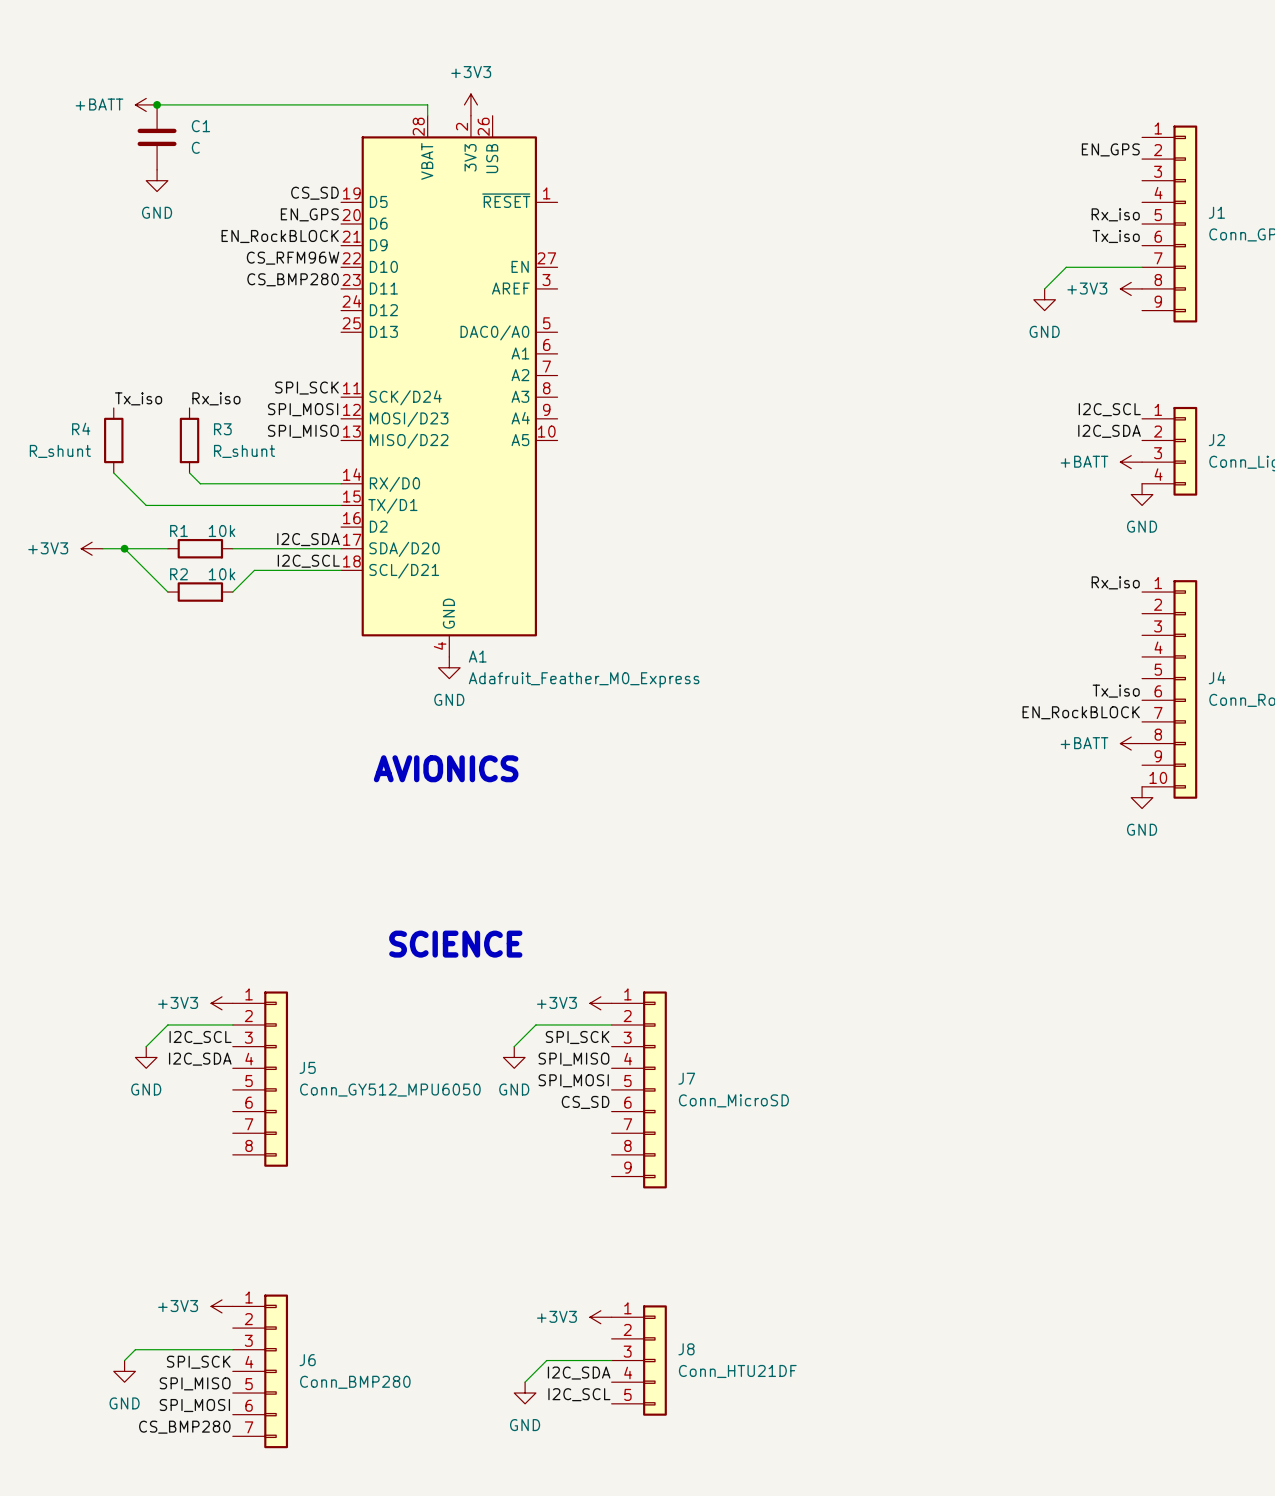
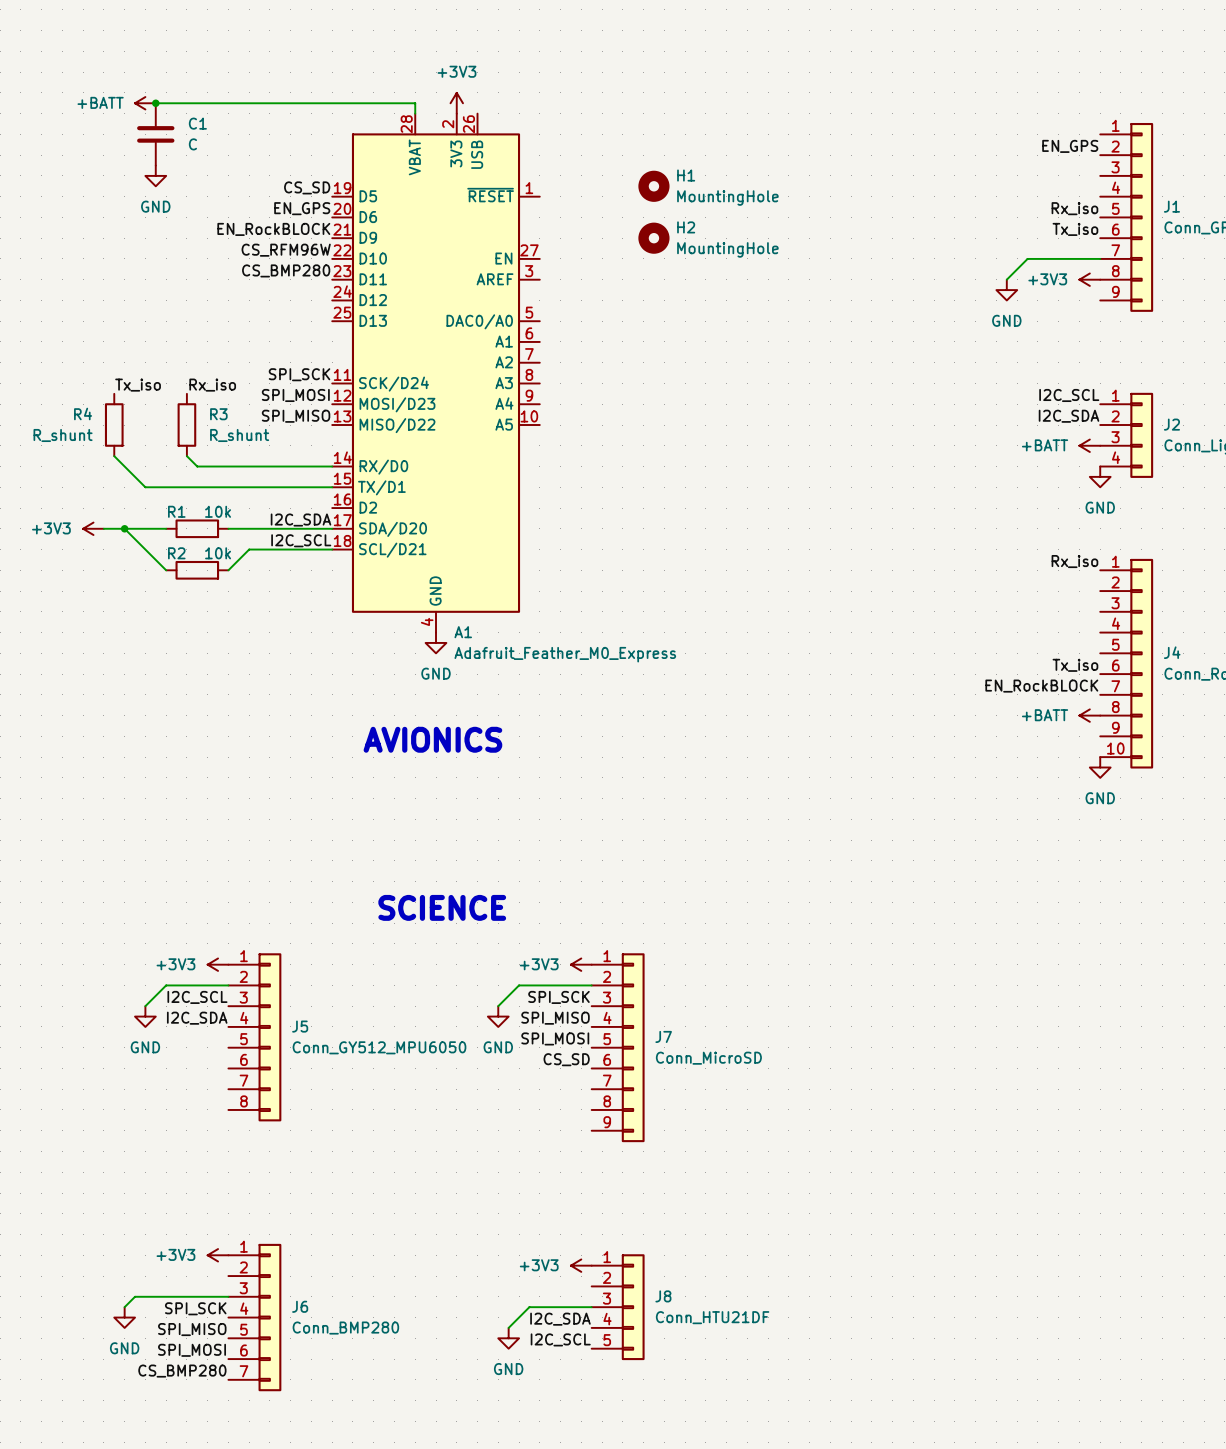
H1: none -> MountingHole (653, 186)
H2: none -> MountingHole (653, 238)

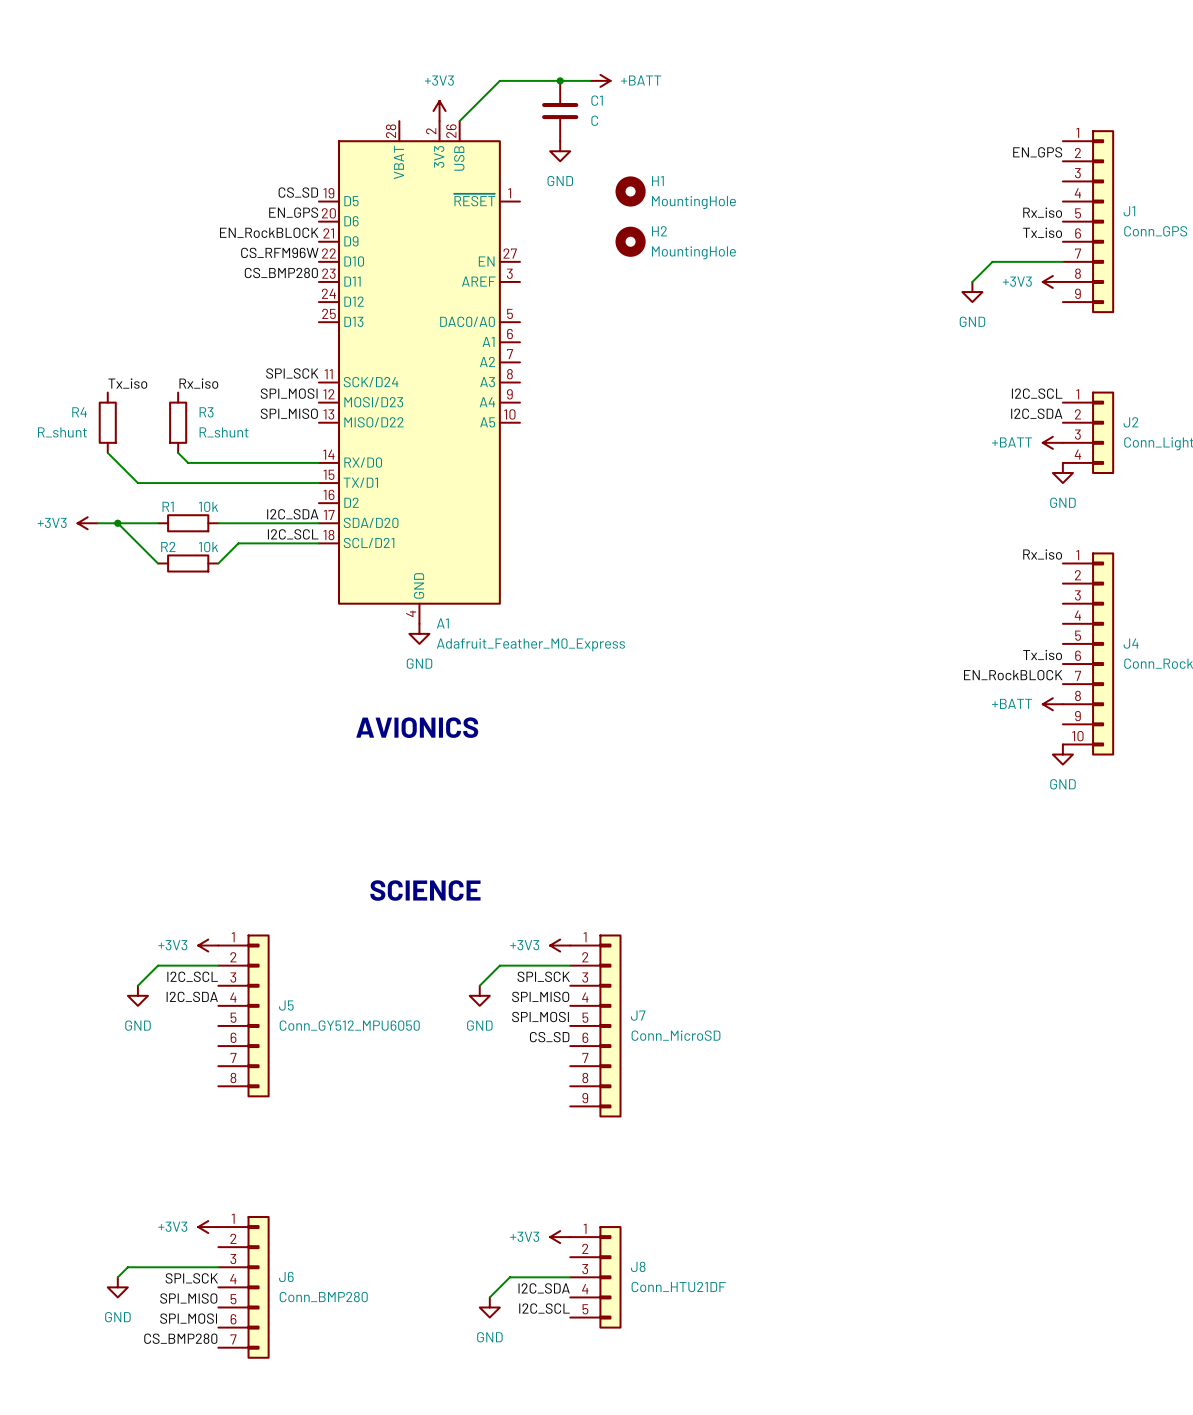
junction: none -> (560, 80)
wire: none -> (590, 80) (499, 80) (459, 121)
power symbol: none -> +BATT (600, 80)
power symbol: +BATT (145, 103) -> none
wire: (155, 103) (415, 103) (415, 113) -> none
junction: (155, 103) -> none
C1 position: (155, 134) -> (560, 111)
power symbol: none -> GND (560, 151)
power symbol: GND (155, 175) -> none

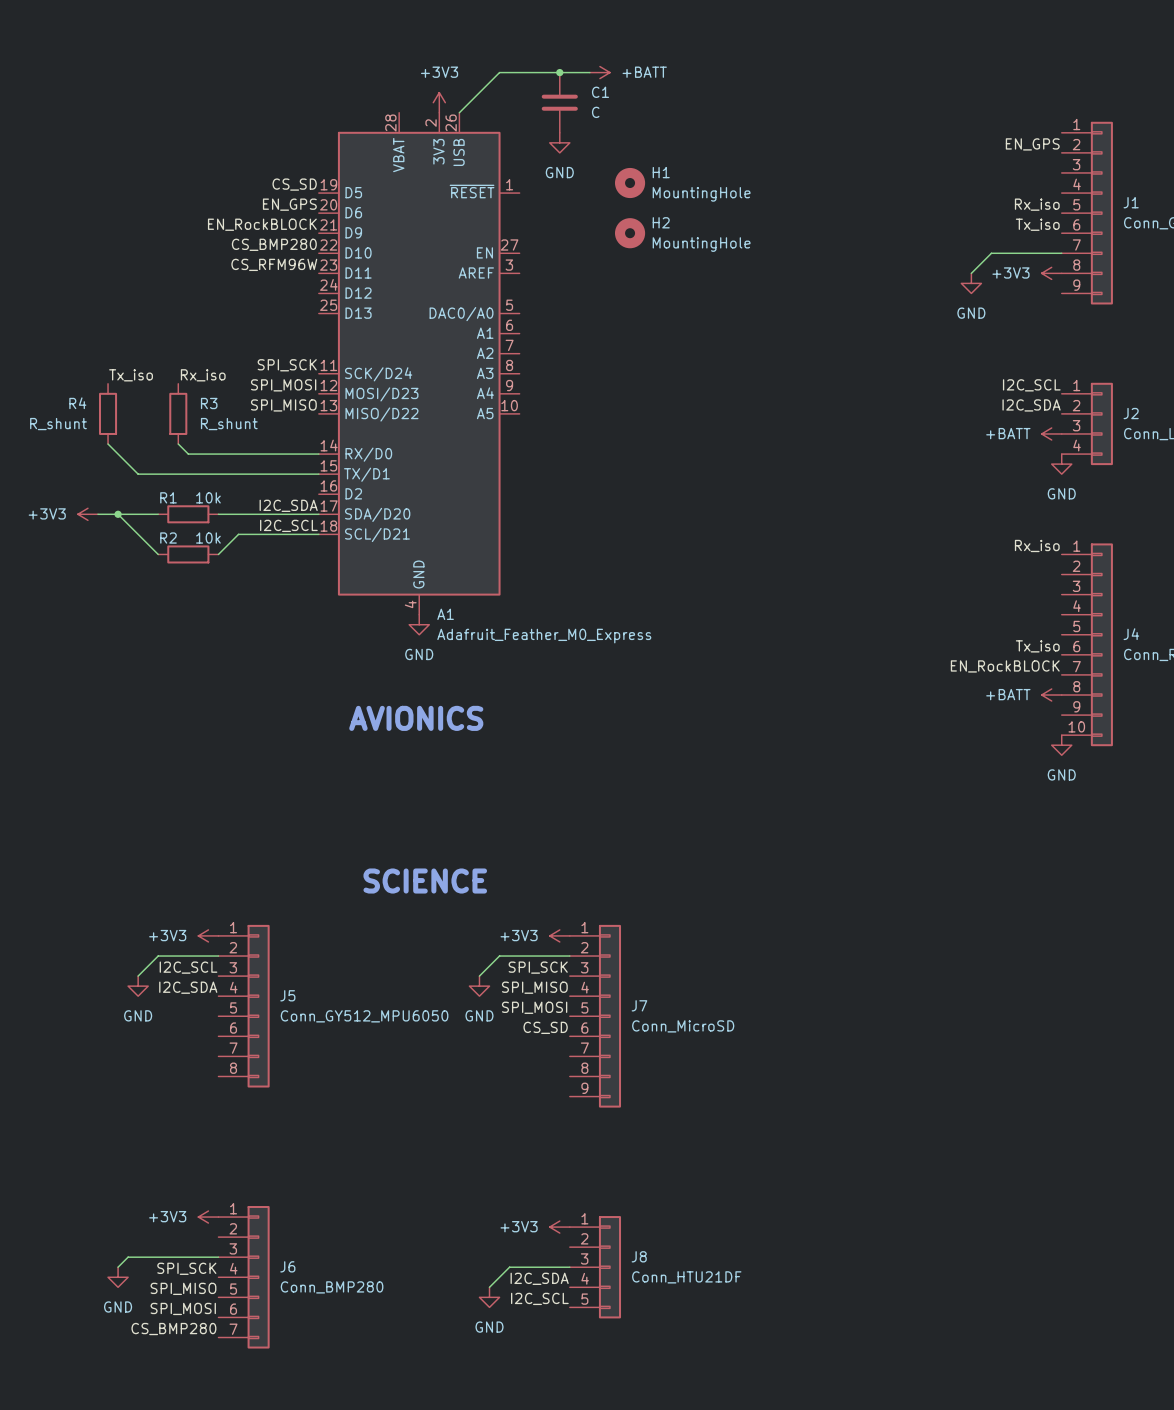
label: CS_RFM96W (279, 252) -> CS_BMP280 (274, 244)
label: CS_BMP280 (281, 273) -> CS_RFM96W (274, 264)

